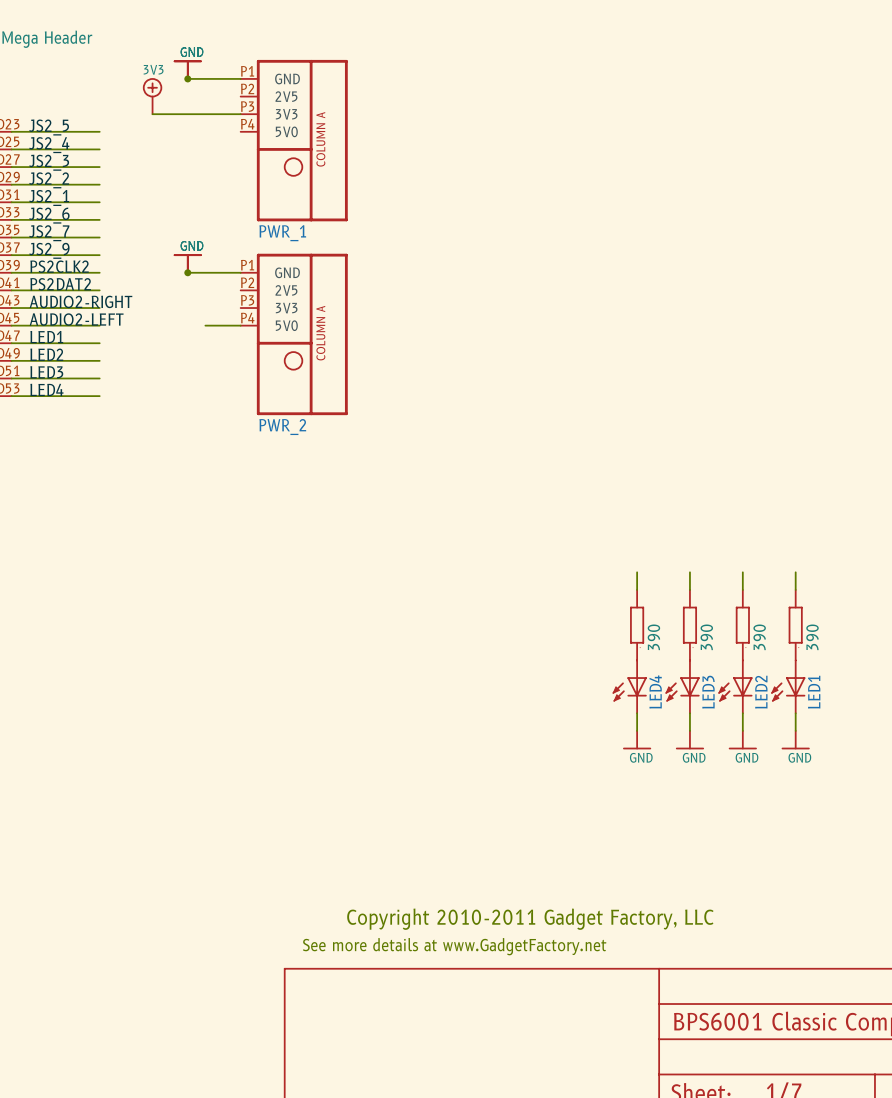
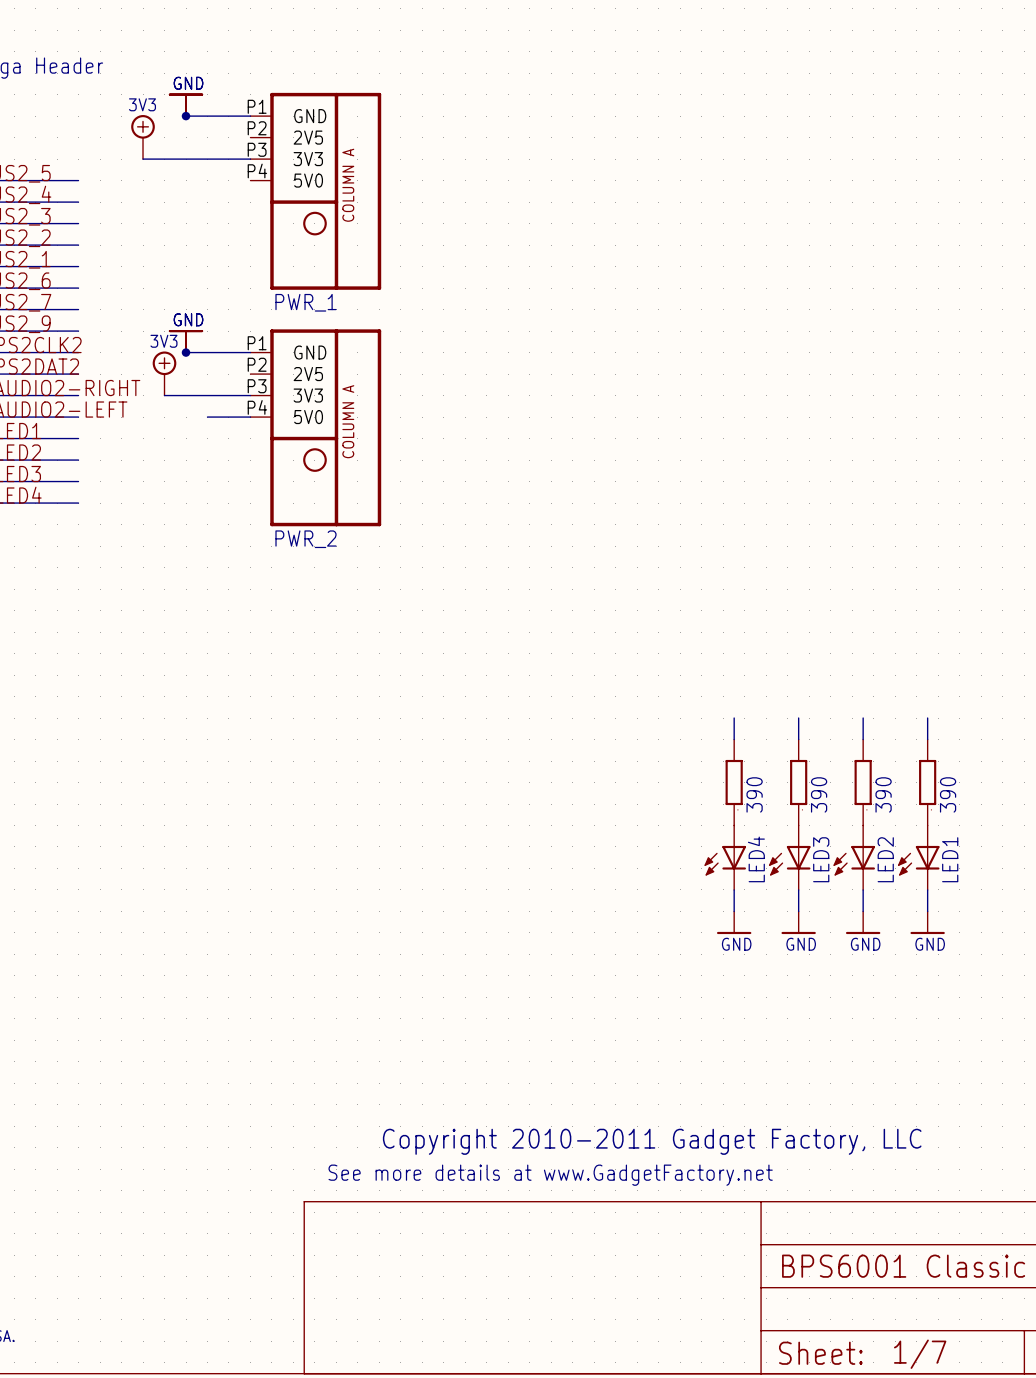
power symbol: none -> 3V3 (164, 373)
wire: none -> (164, 395) (250, 395)

